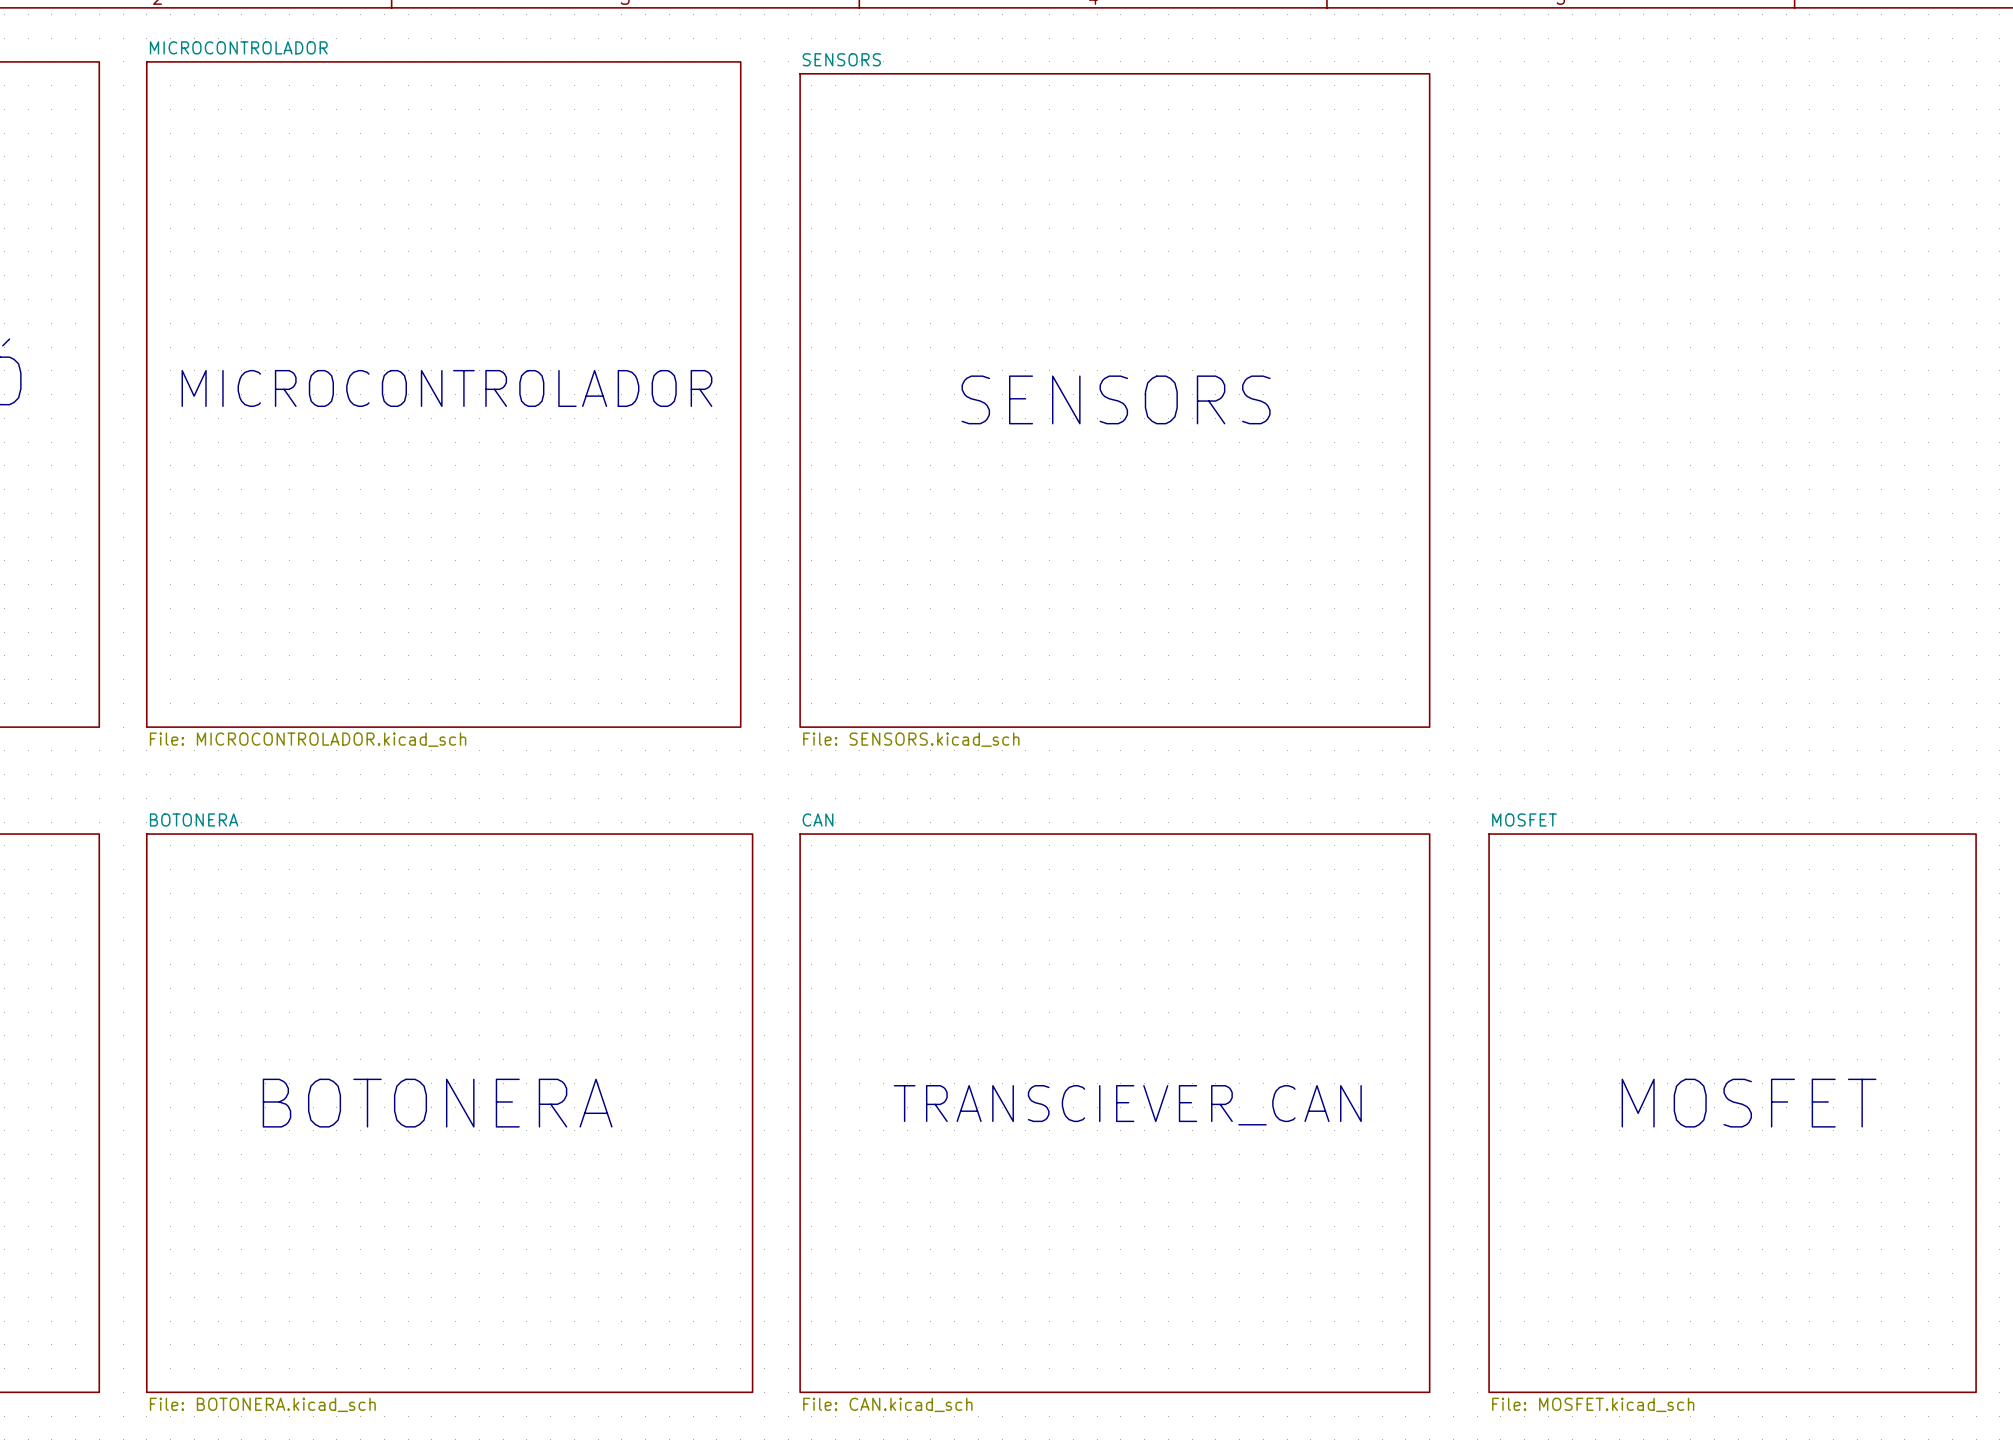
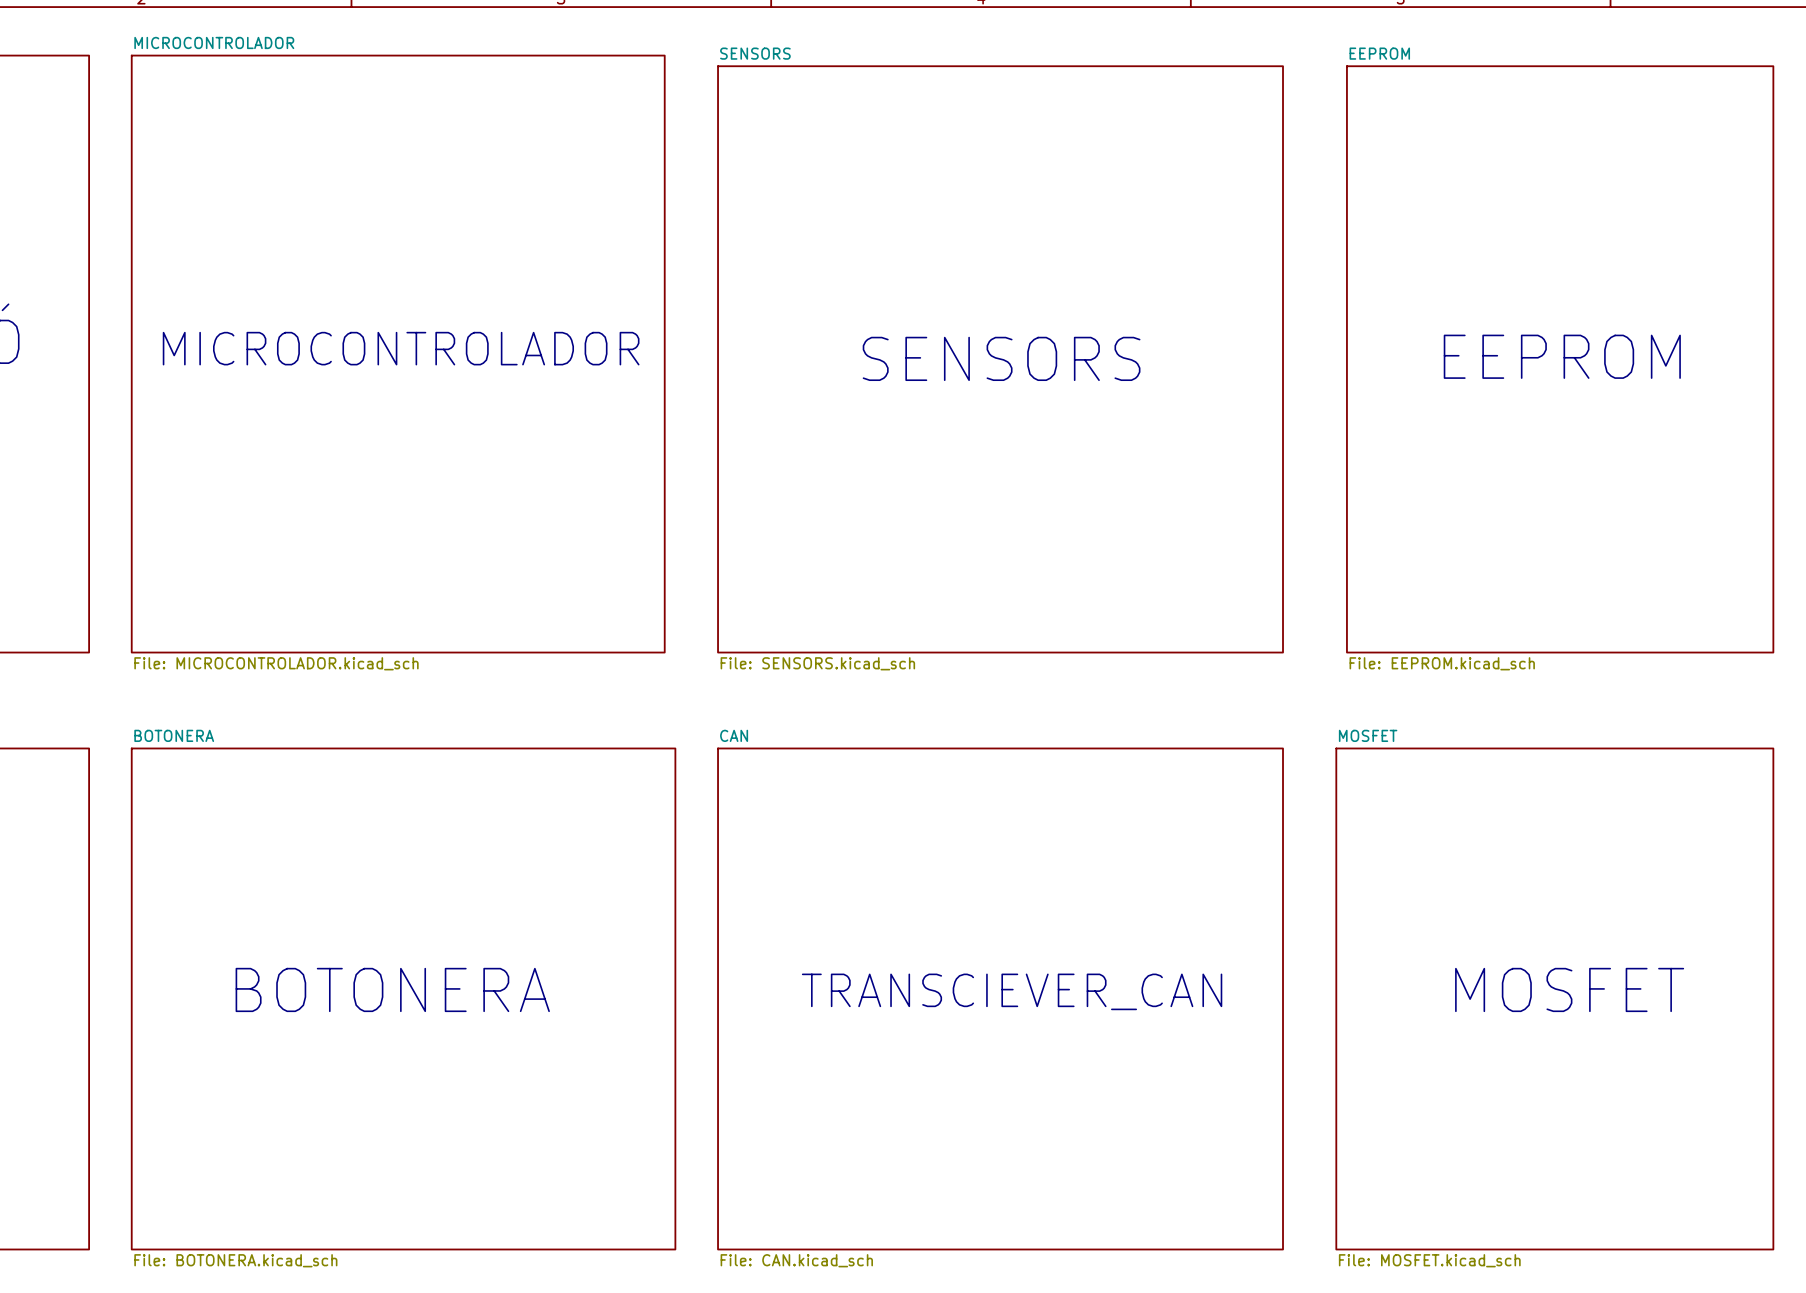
text: none -> EEPROM (1562, 356)
sheet EEPROM: none -> File: EEPROM.kicad_sch (1560, 359)

